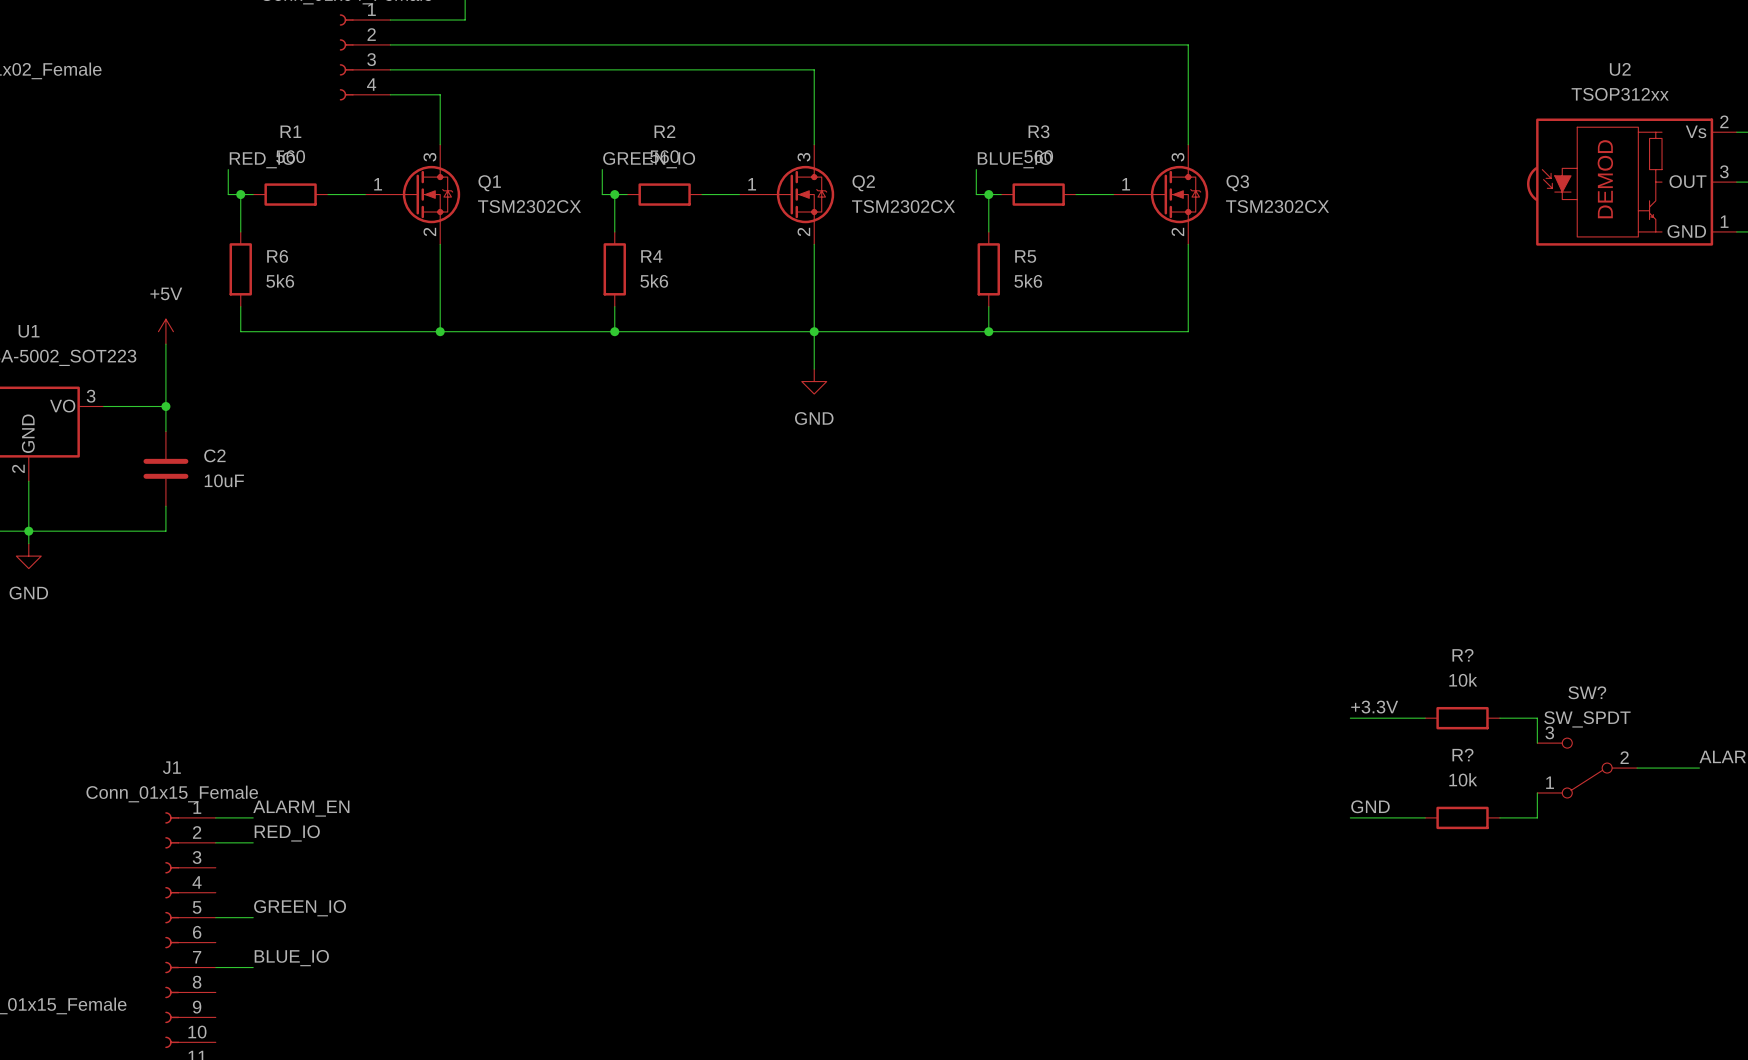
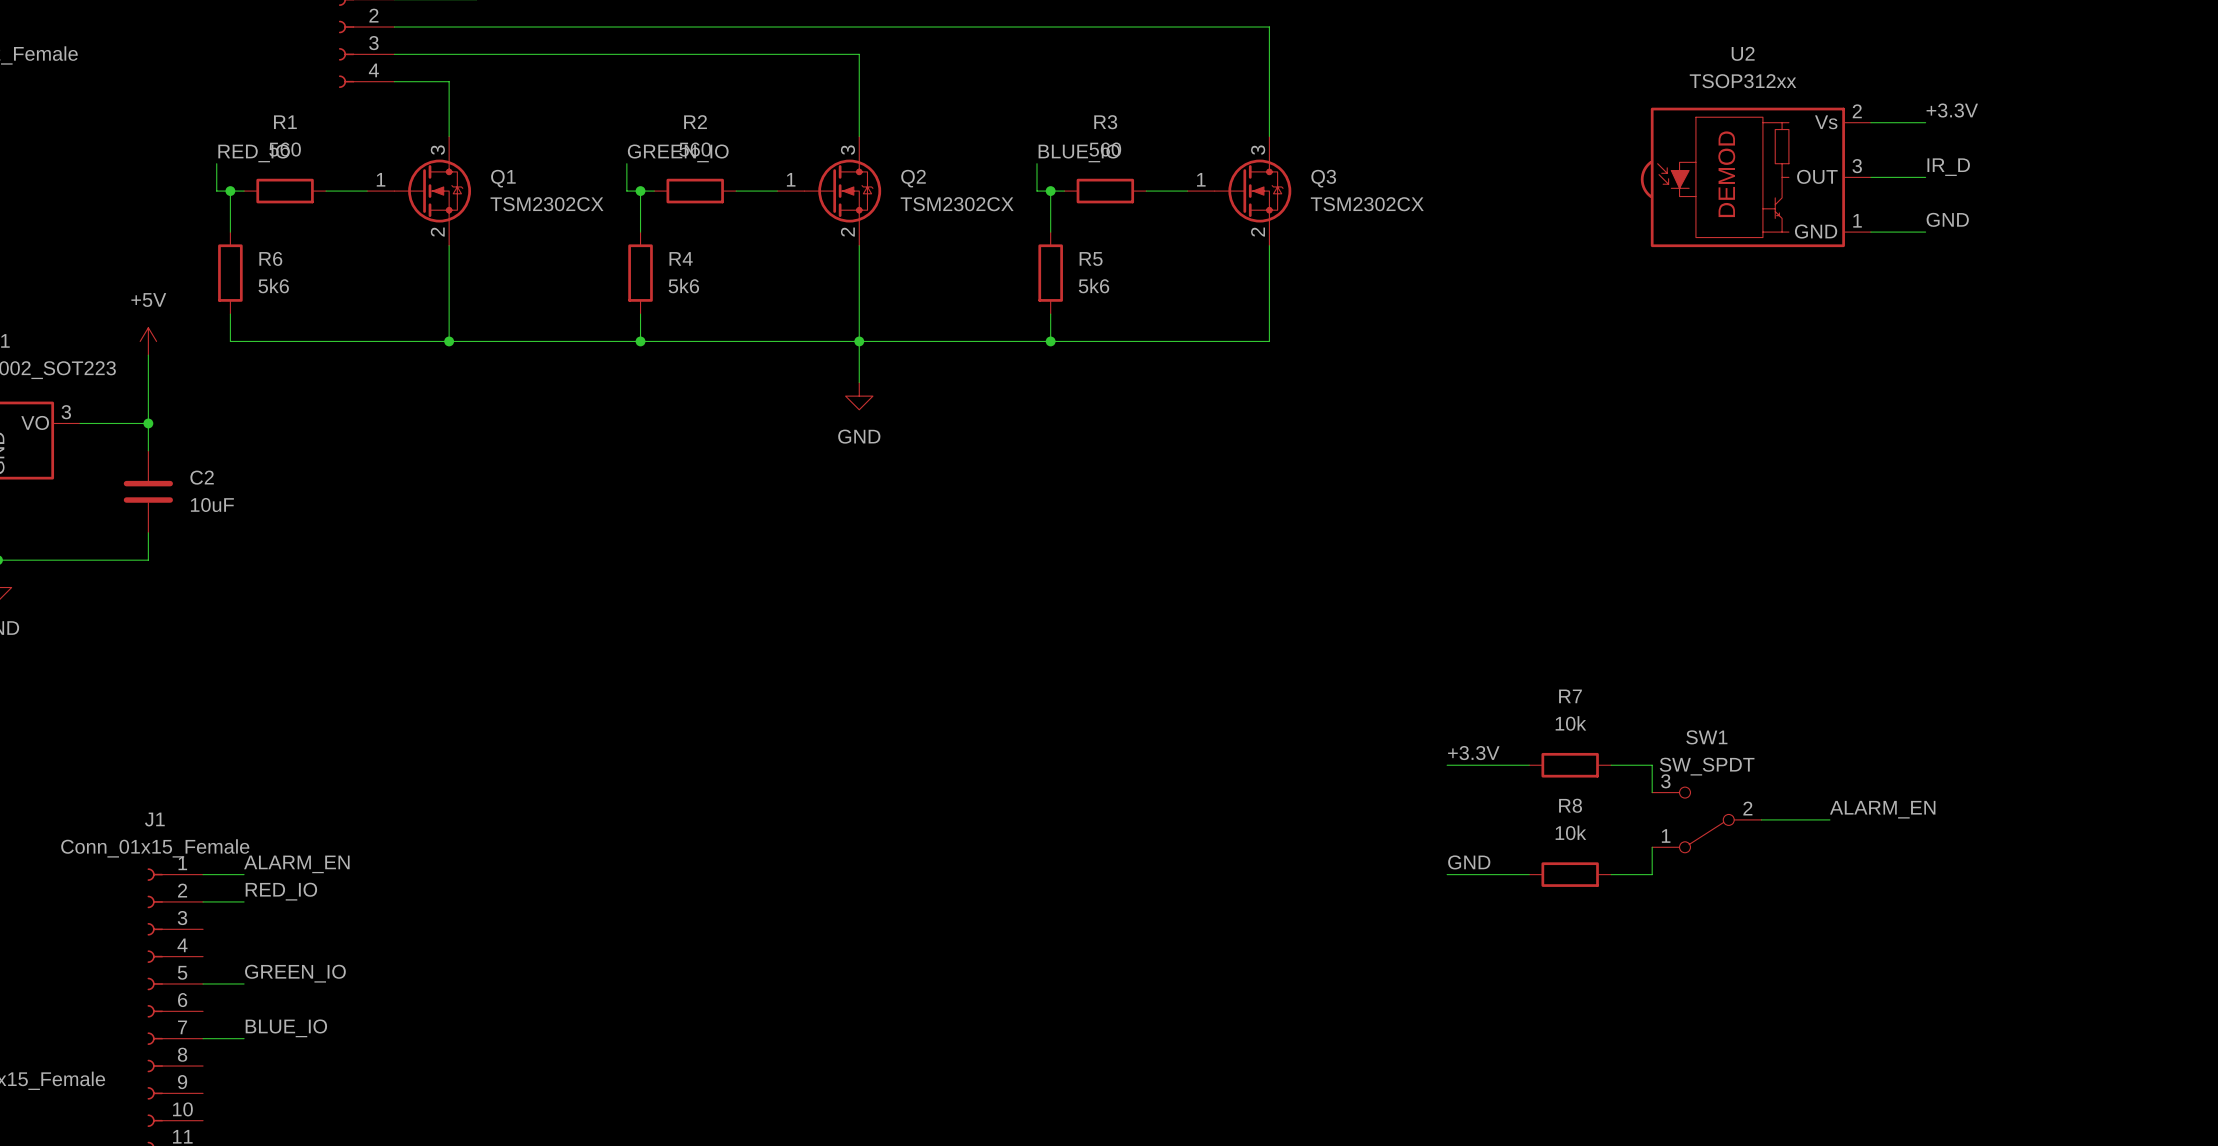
R? name: R? (1462, 655) -> R7 (1570, 696)
SW? name: SW? (1587, 692) -> SW1 (1706, 737)
R? name: R? (1462, 755) -> R8 (1570, 805)

